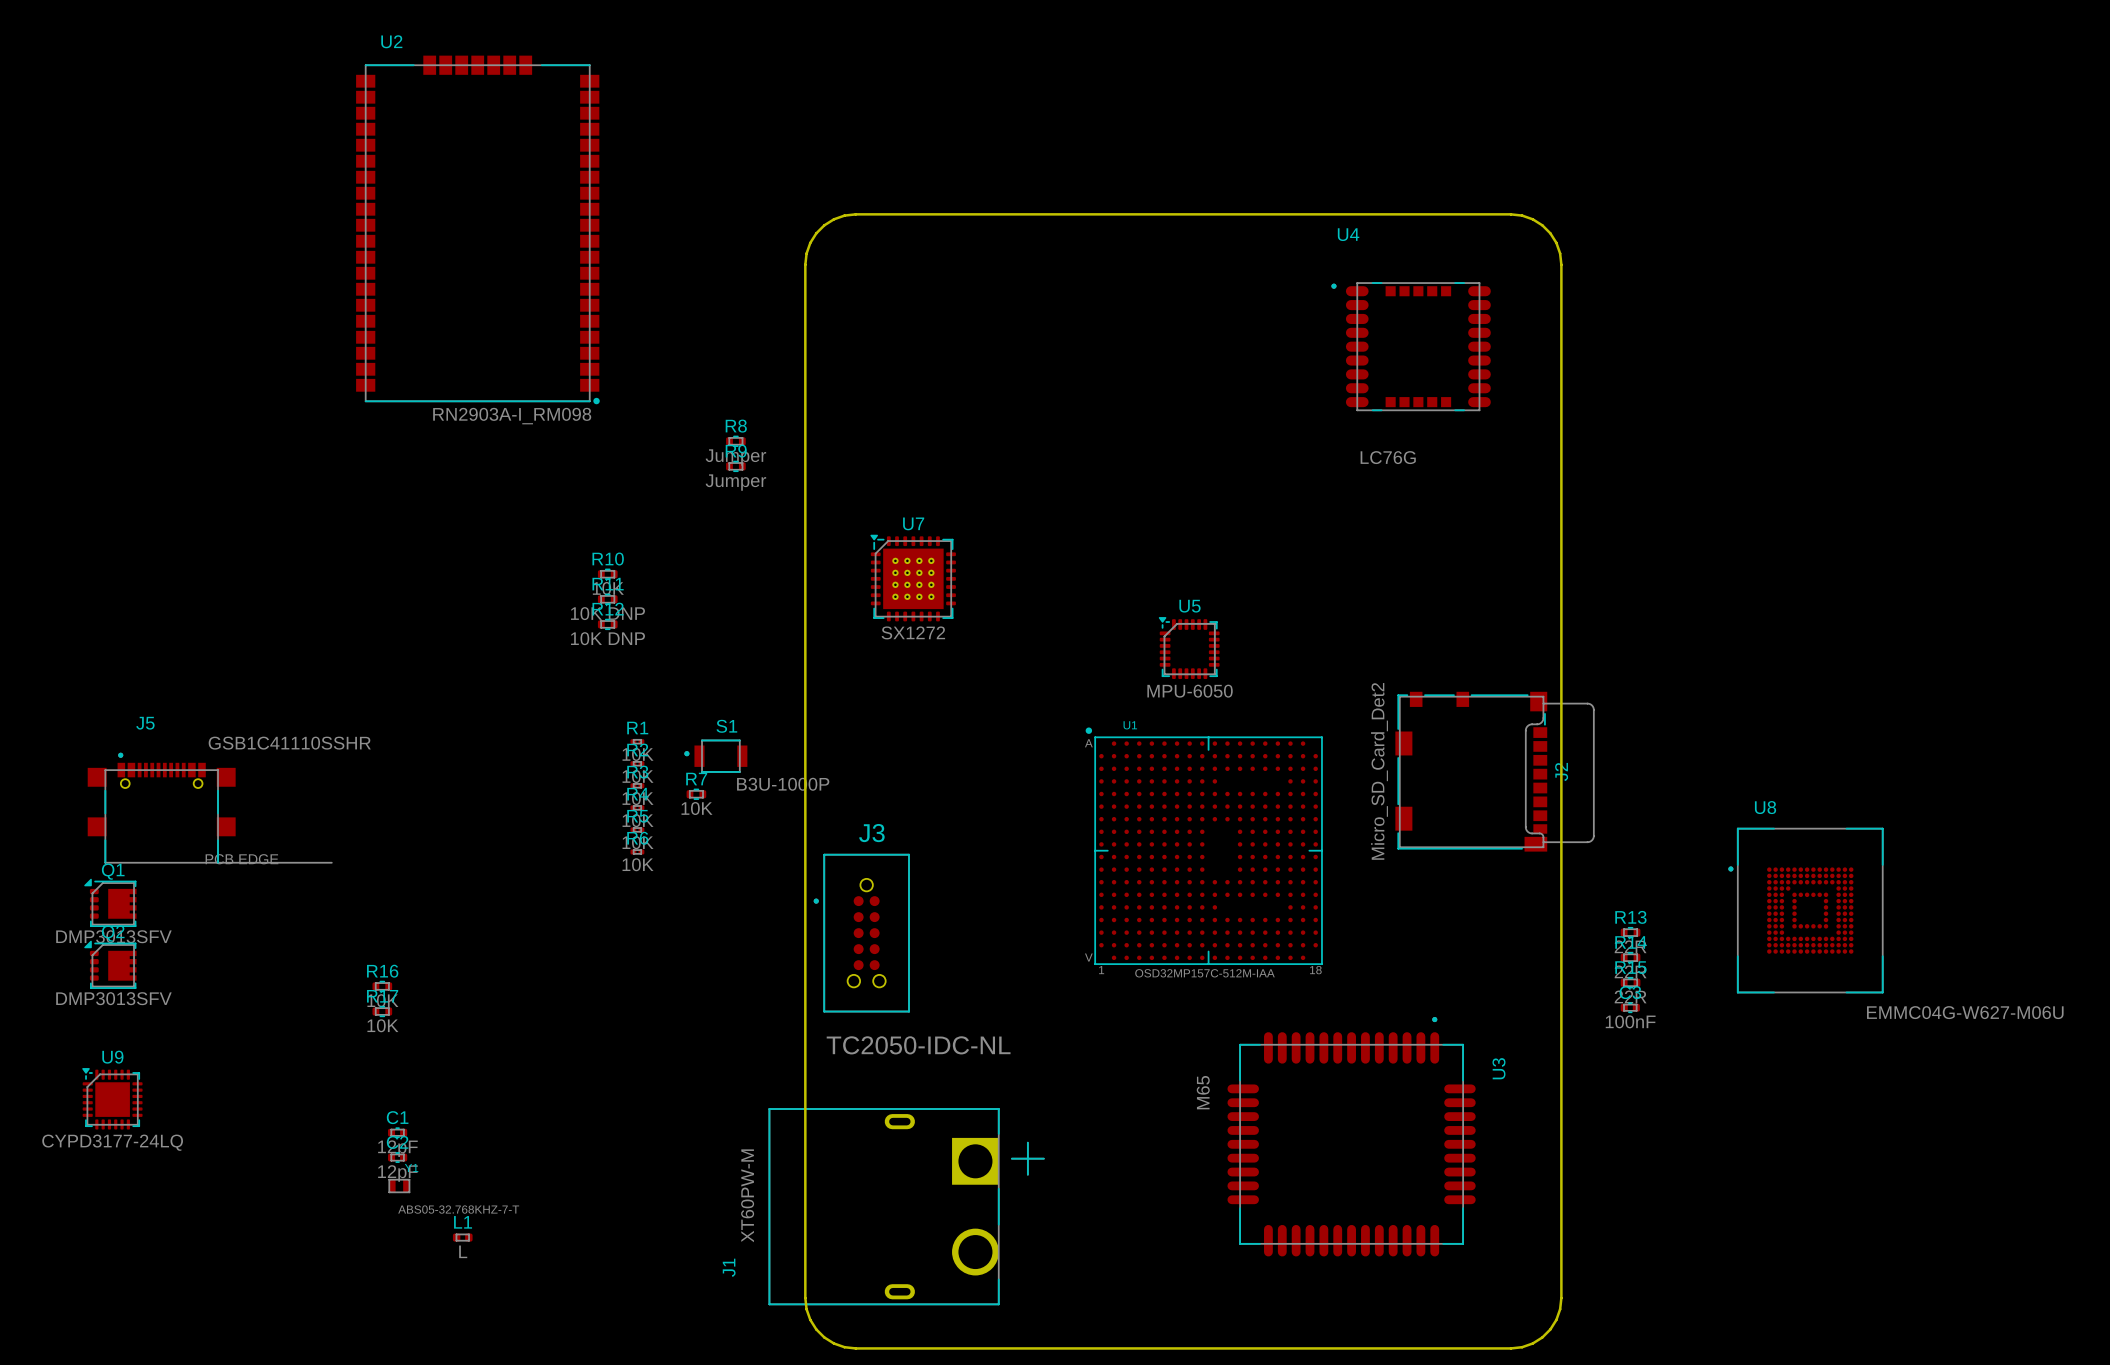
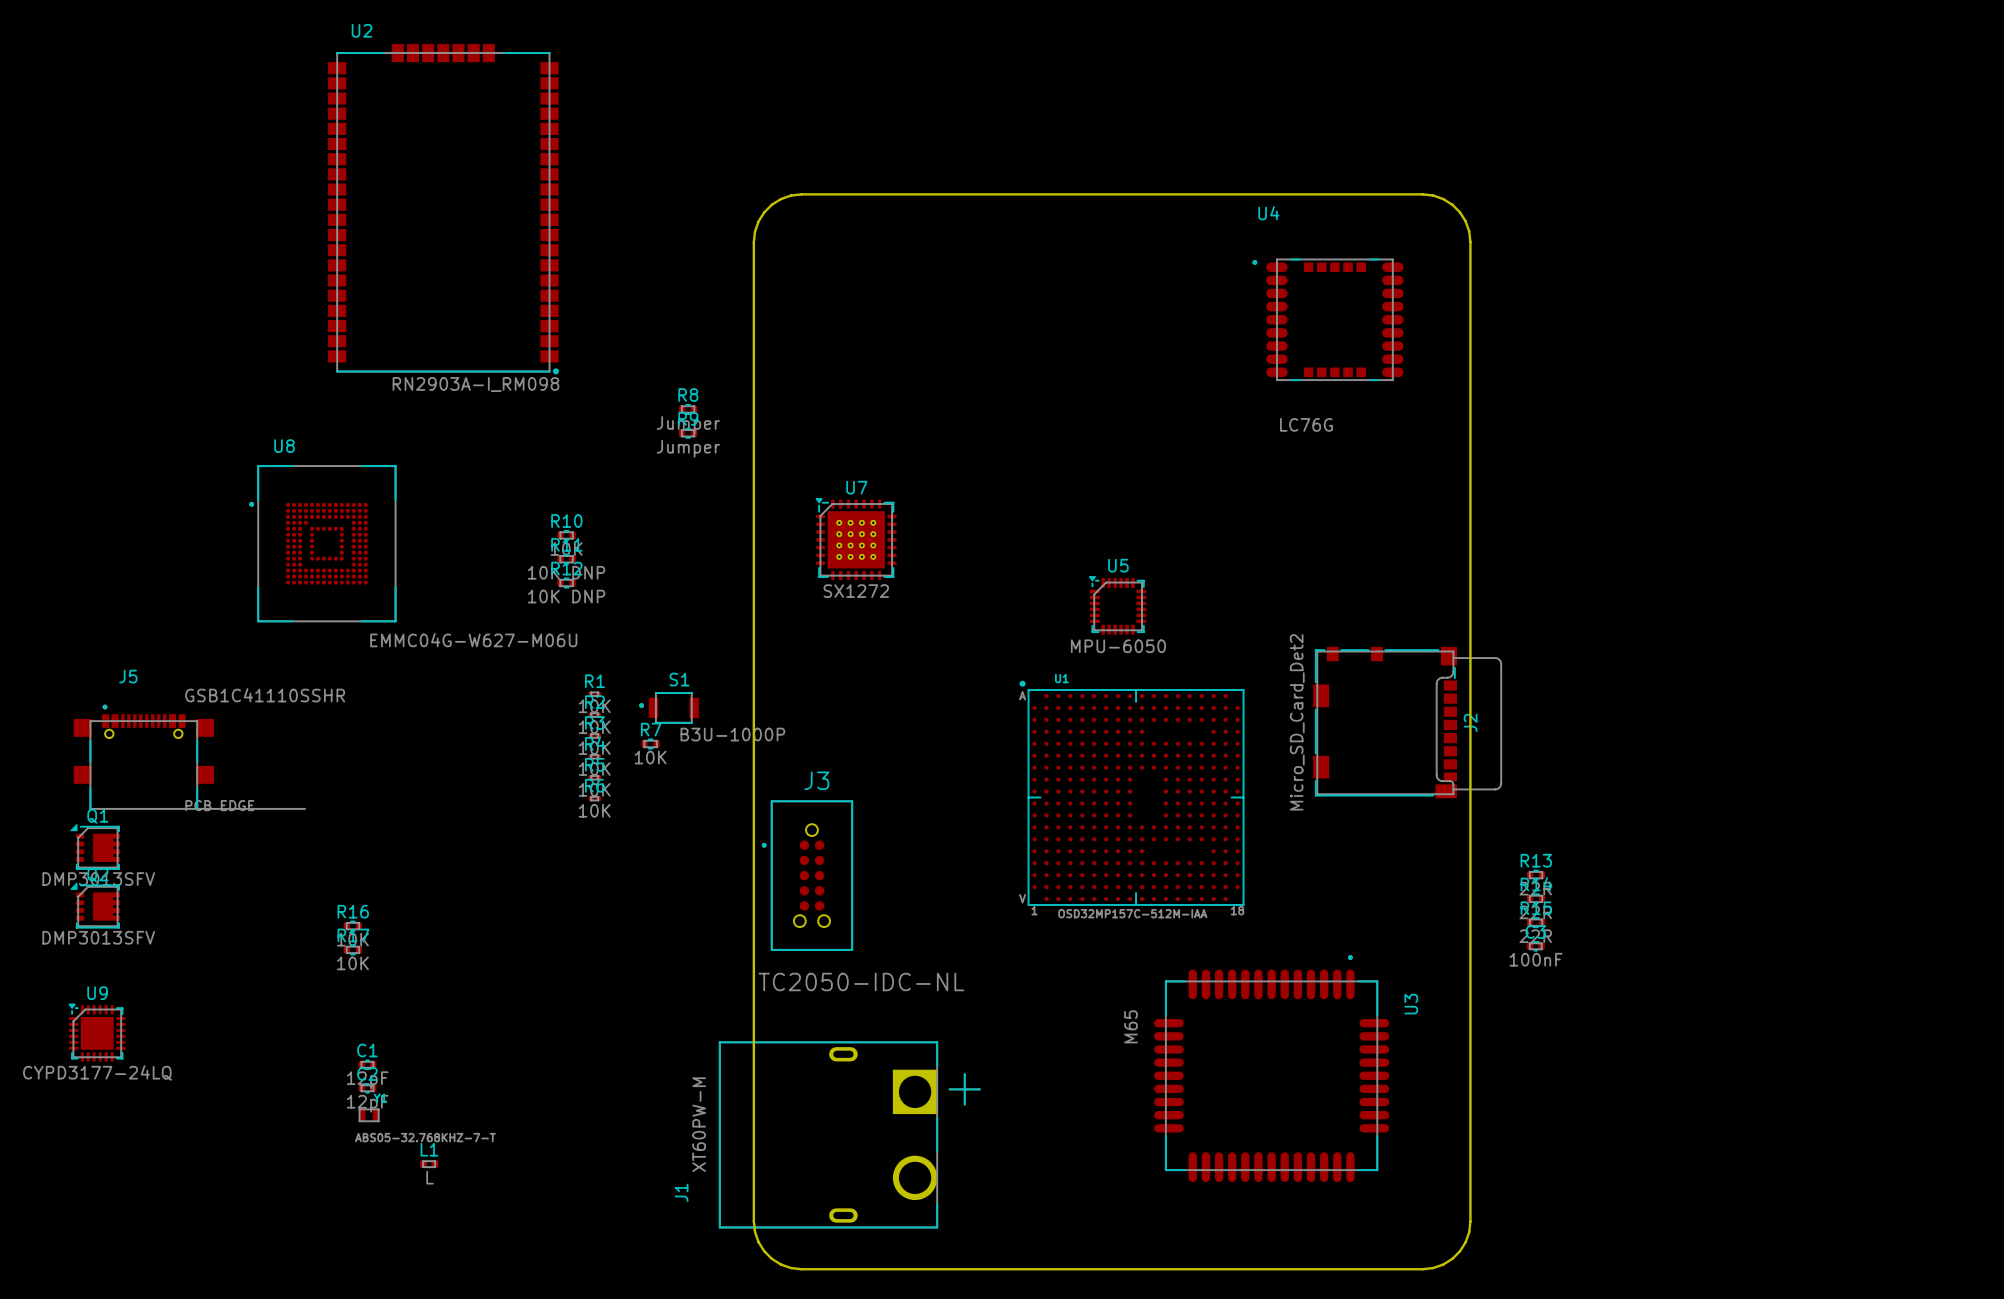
U8 position: (1805, 910) -> (322, 543)

